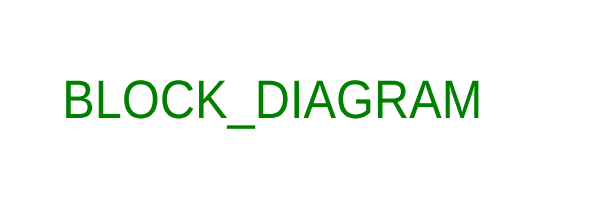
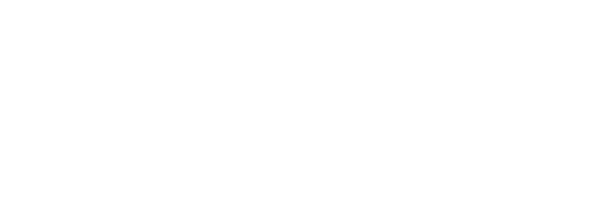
text: BLOCK_DIAGRAM (272, 104) -> none

